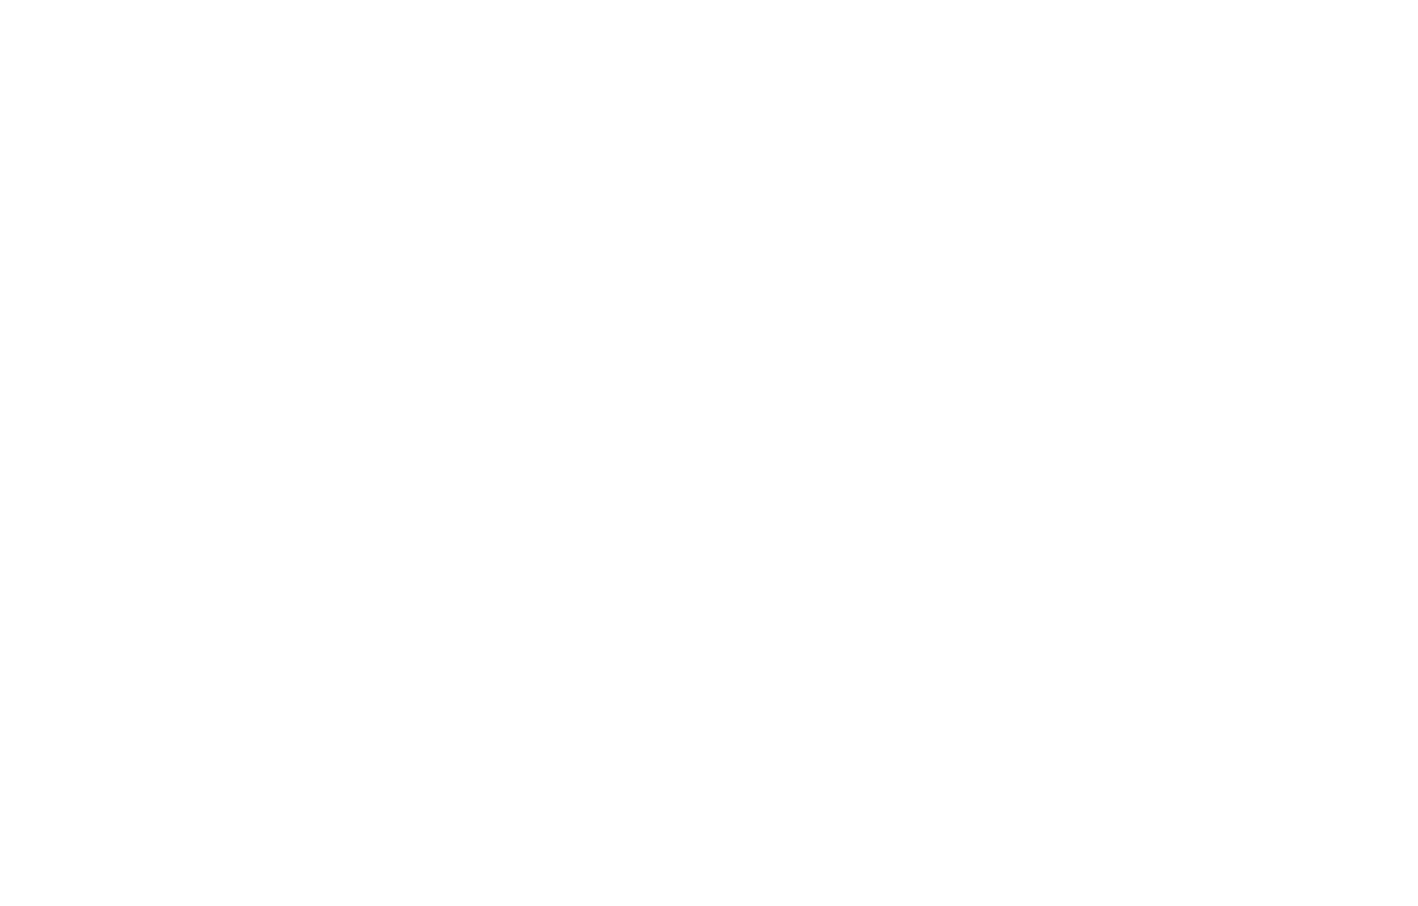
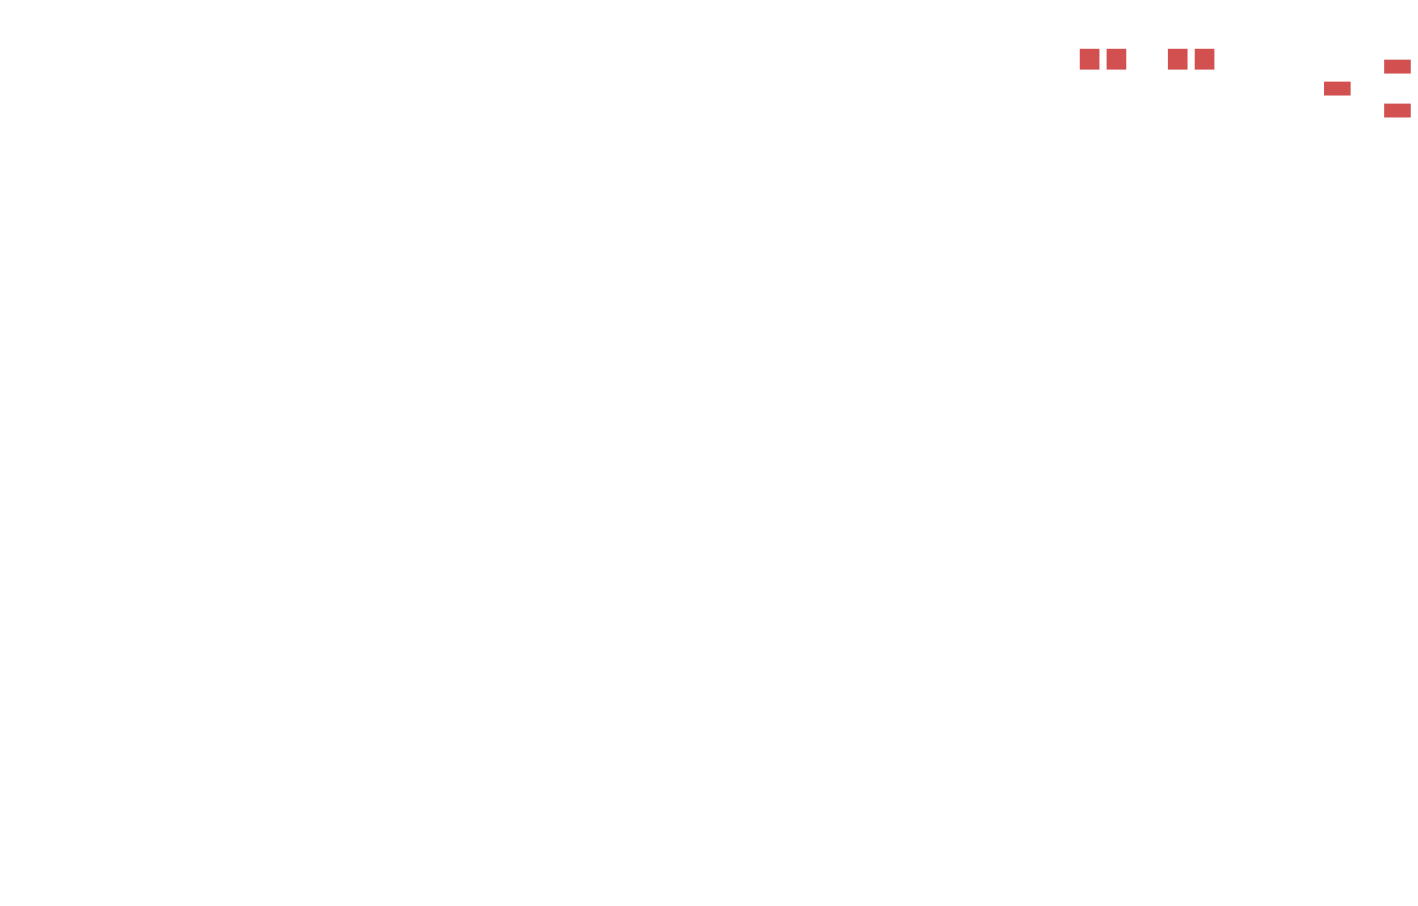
part: none -> (1103, 59)
part: none -> (1191, 59)
part: none -> (1367, 88)

